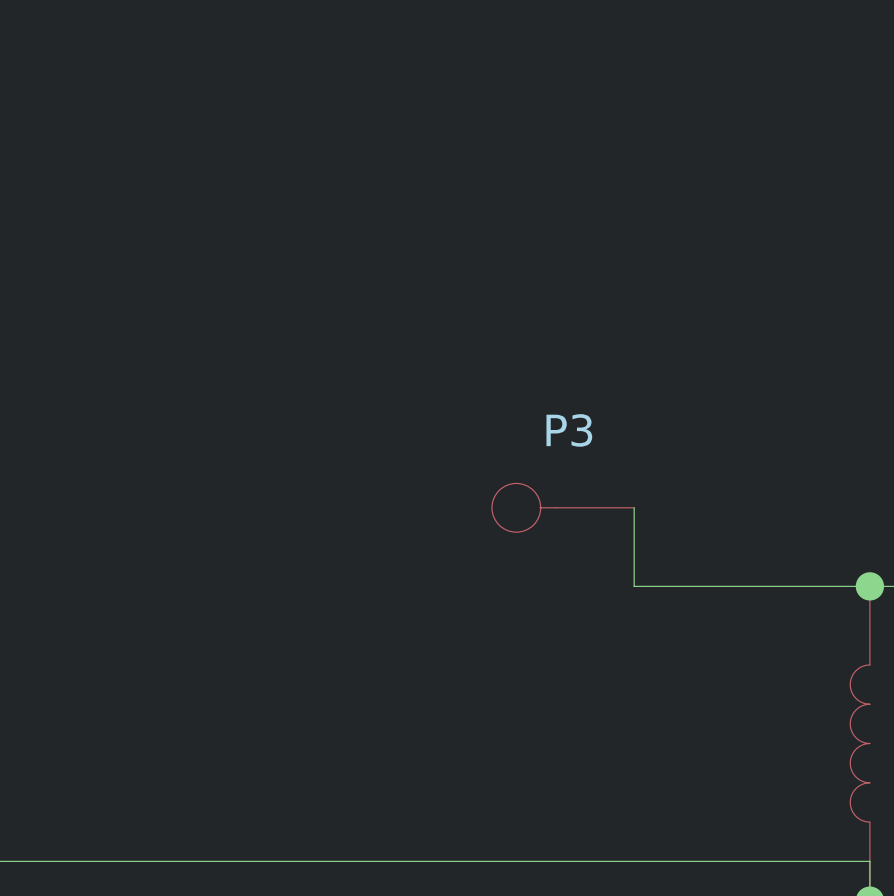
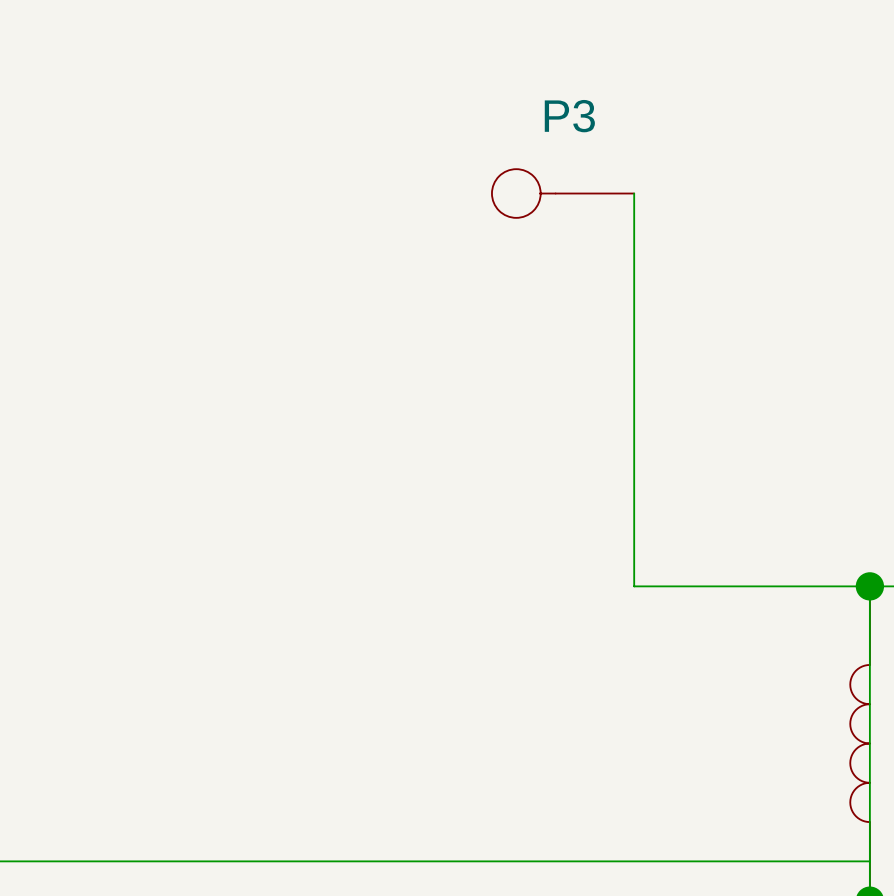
wire: none -> (634, 193) (634, 507)
P3 position: (563, 507) -> (563, 193)
wire: none -> (869, 586) (869, 861)

